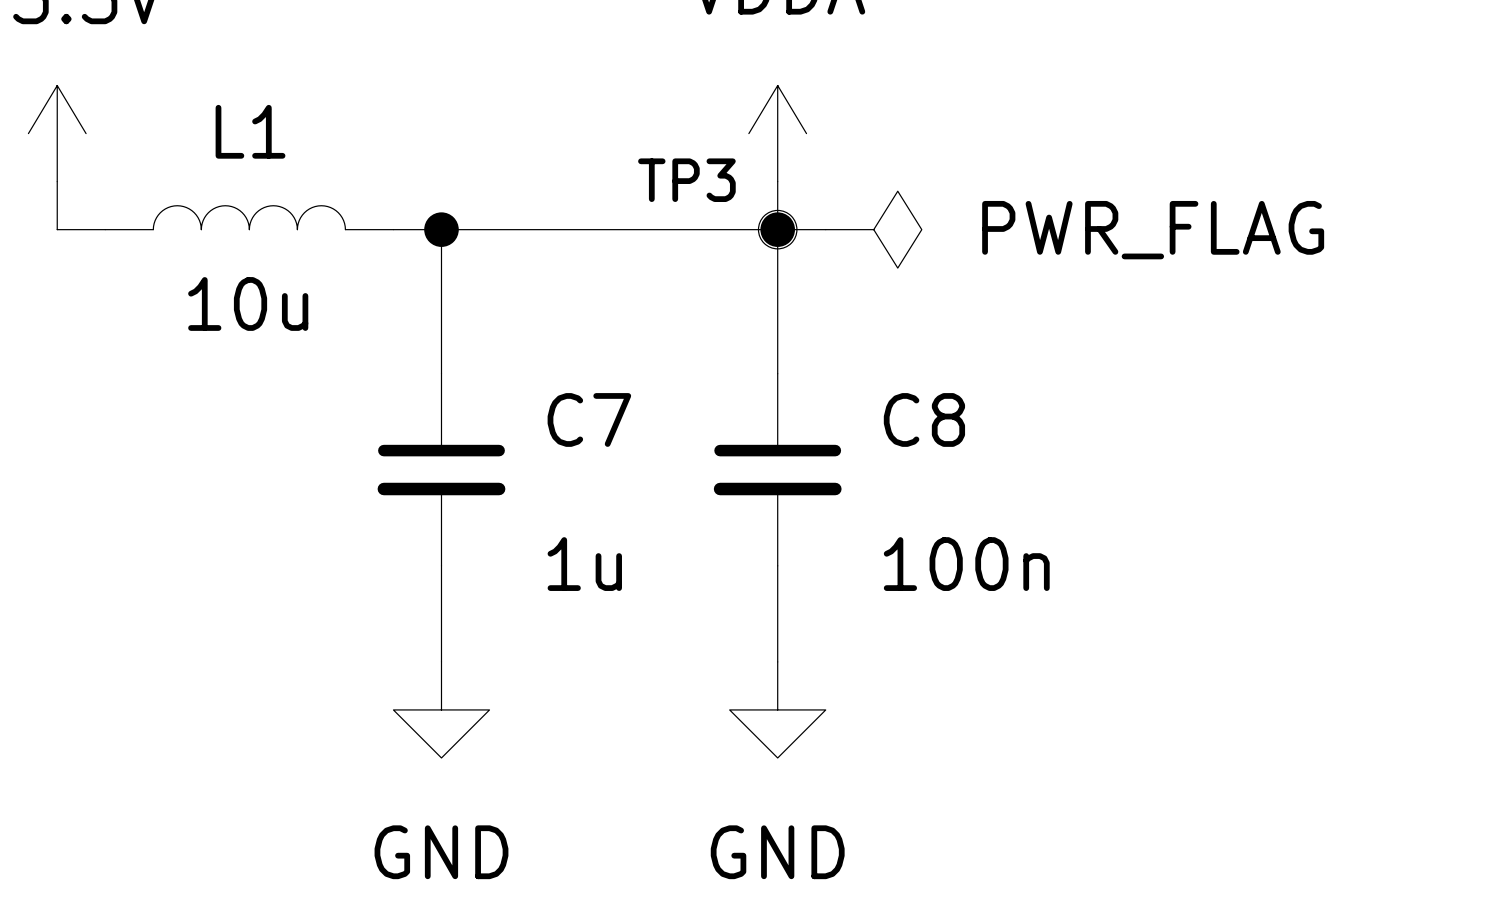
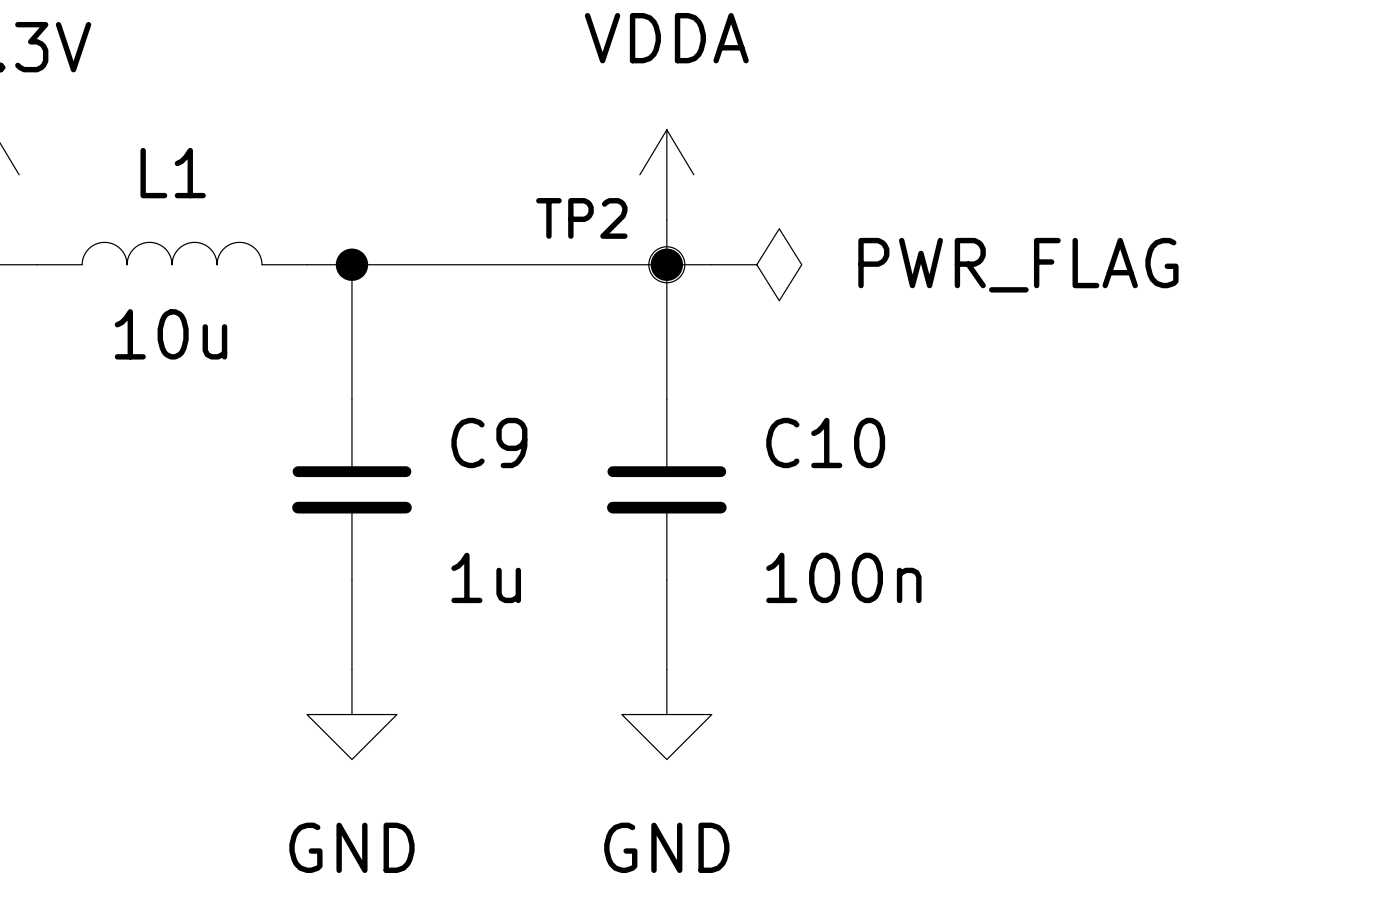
TP3 name: TP3 (686, 180) -> TP2 (581, 218)
C7 name: C7 (589, 419) -> C9 (489, 442)
C8 name: C8 (924, 419) -> C10 (825, 442)

